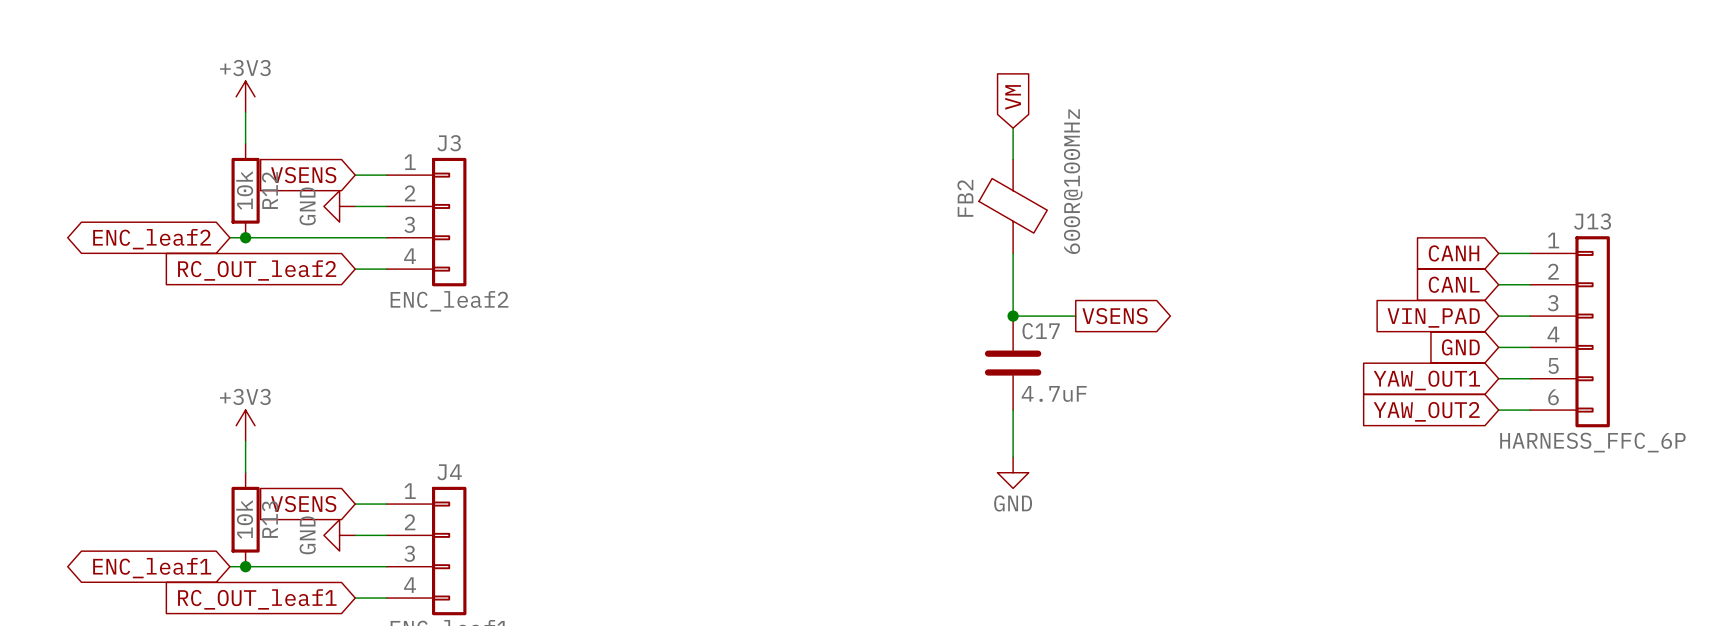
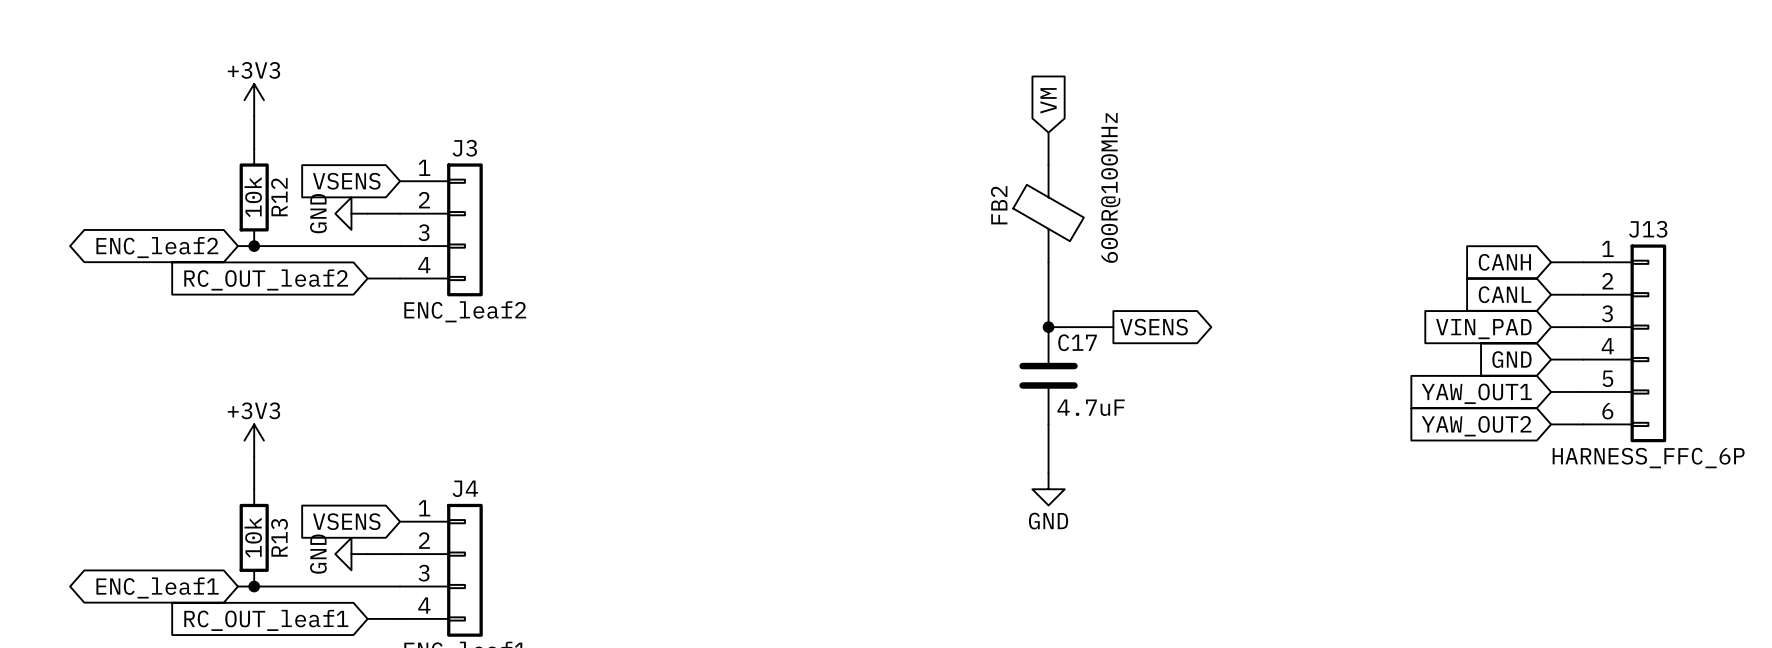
global label position: VSENS (303, 175) -> VSENS (346, 181)
wire: (355, 175) (386, 175) -> none
global label position: VSENS (303, 504) -> VSENS (346, 521)
wire: (355, 504) (386, 504) -> none

